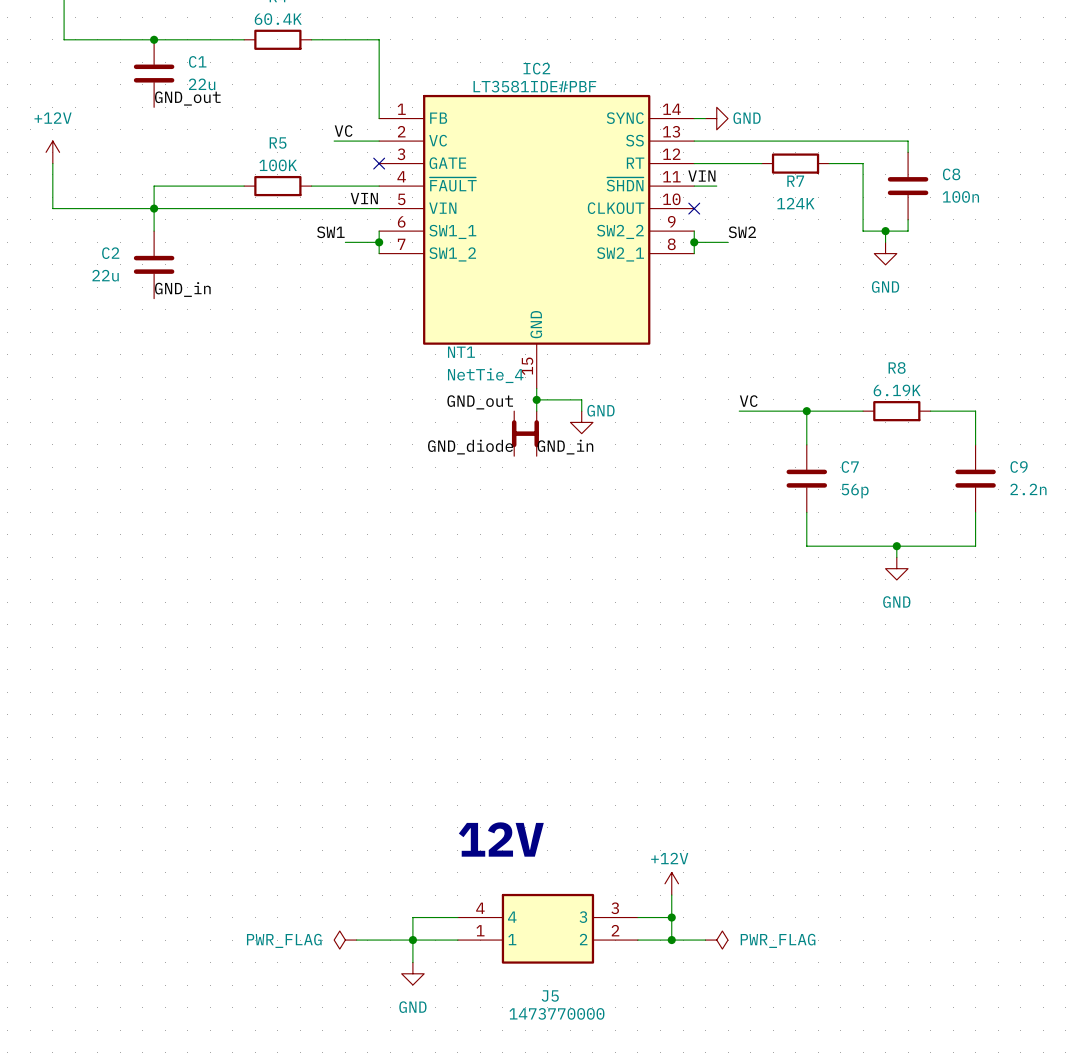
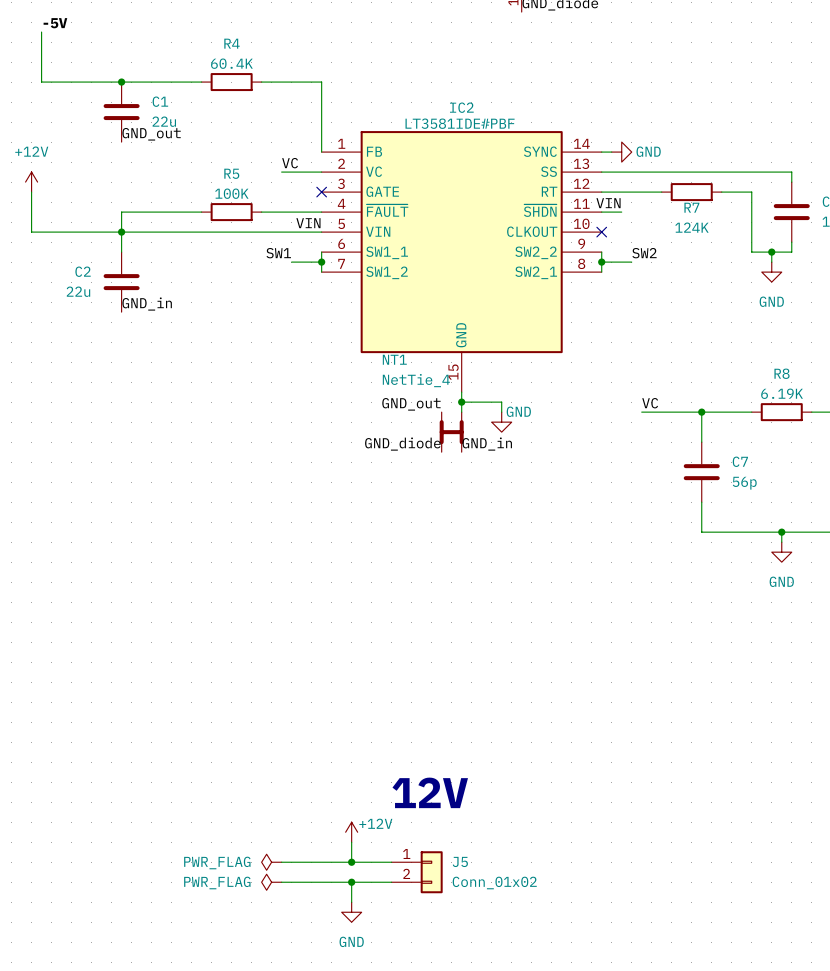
power symbol: none -> +12V (351, 832)
power symbol: +12V (671, 883) -> none
J5 symbol: [457, 893, 638, 964] -> [391, 851, 443, 894]
wire: none -> (351, 842) (351, 862) (281, 862)
wire: (671, 895) (671, 940) -> none
power symbol: none -> PWR_FLAG (271, 862)
wire: (412, 917) (412, 940) -> none
junction: none -> (351, 862)
wire: (637, 917) (671, 917) -> none
junction: (671, 917) -> none
power symbol: none -> PWR_FLAG (271, 882)
power symbol: PWR_FLAG (345, 940) -> none
wire: (637, 940) (705, 940) -> none
junction: (671, 940) -> none
power symbol: PWR_FLAG (716, 940) -> none
J5 name position: J5 (550, 995) -> J5 (460, 861)
J5 value: 1473770000 (556, 1013) -> Conn_01x02 (494, 882)

